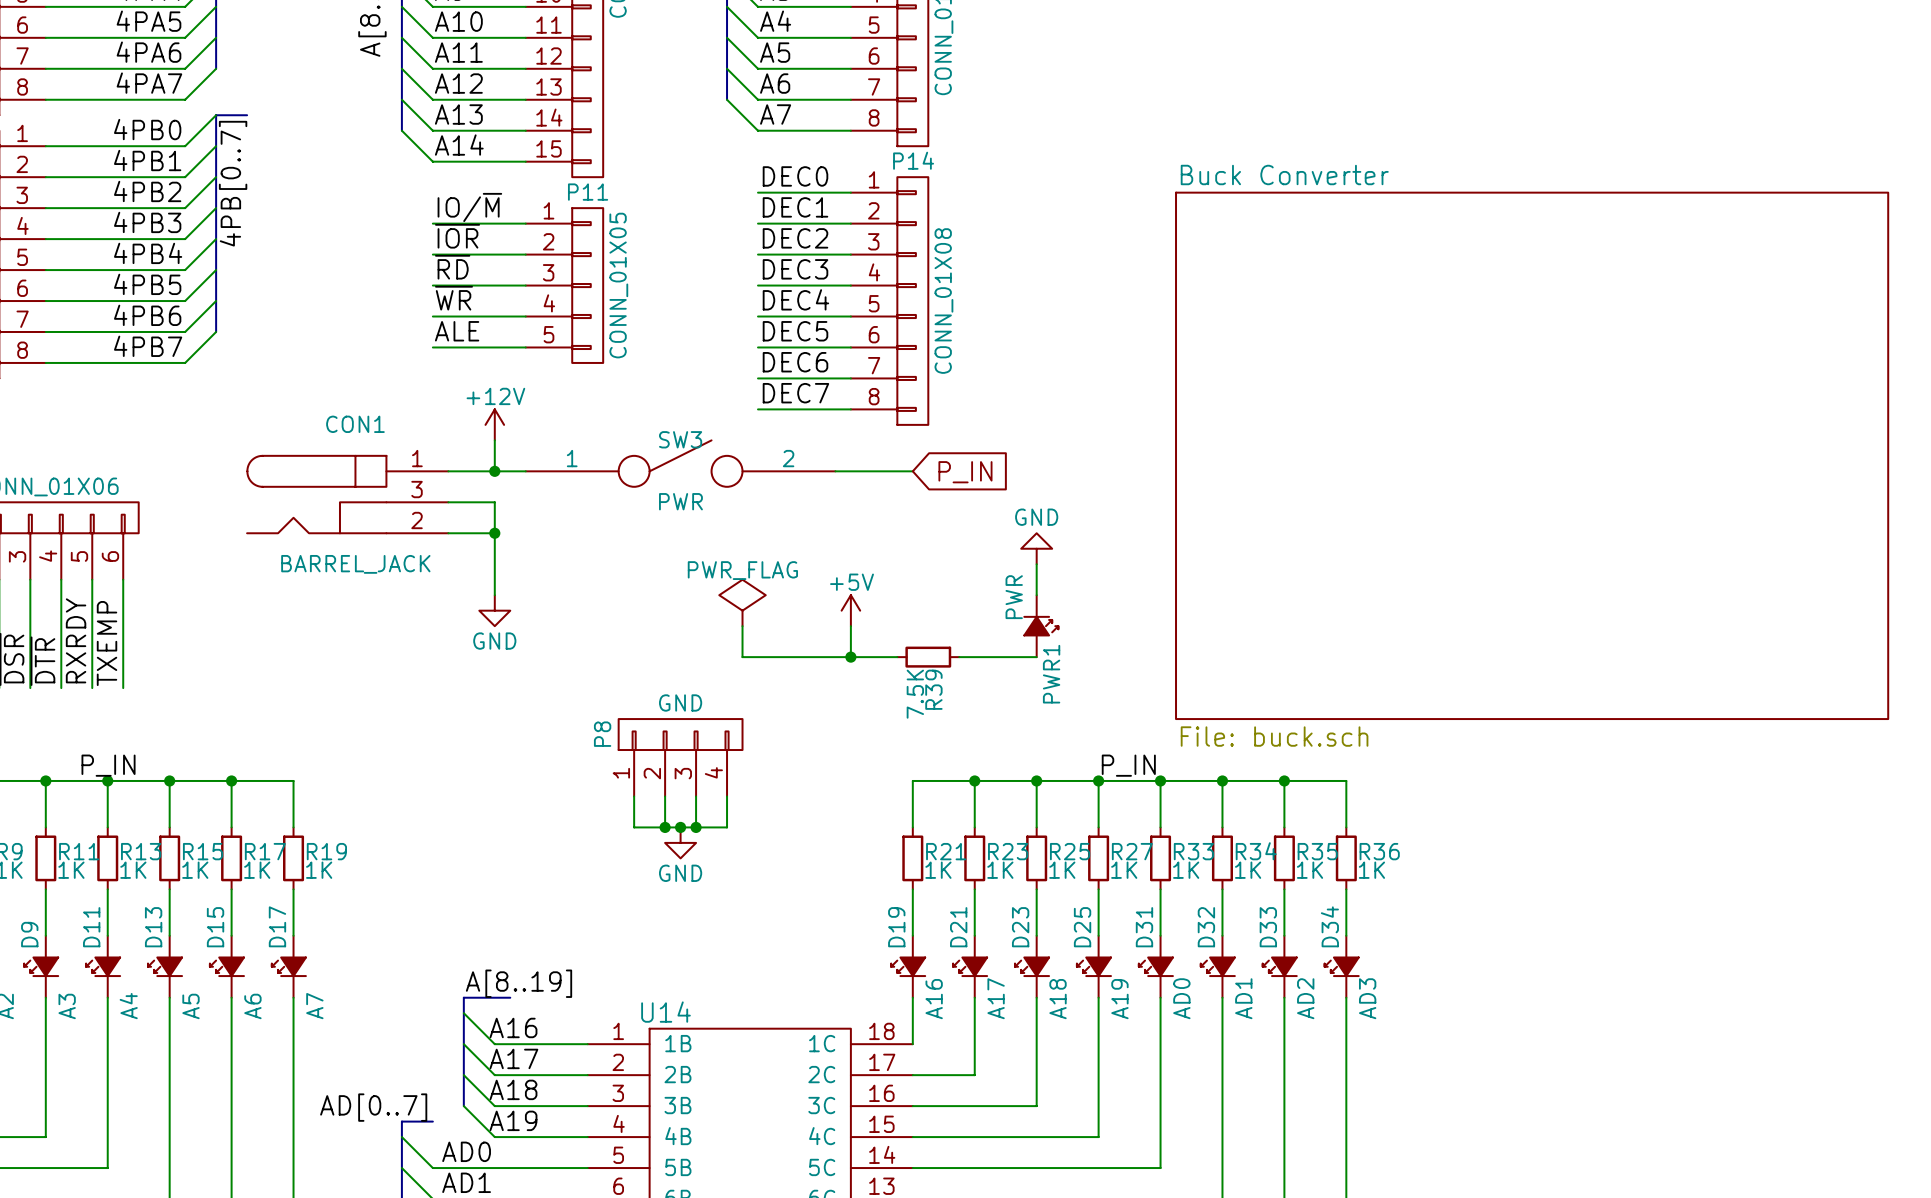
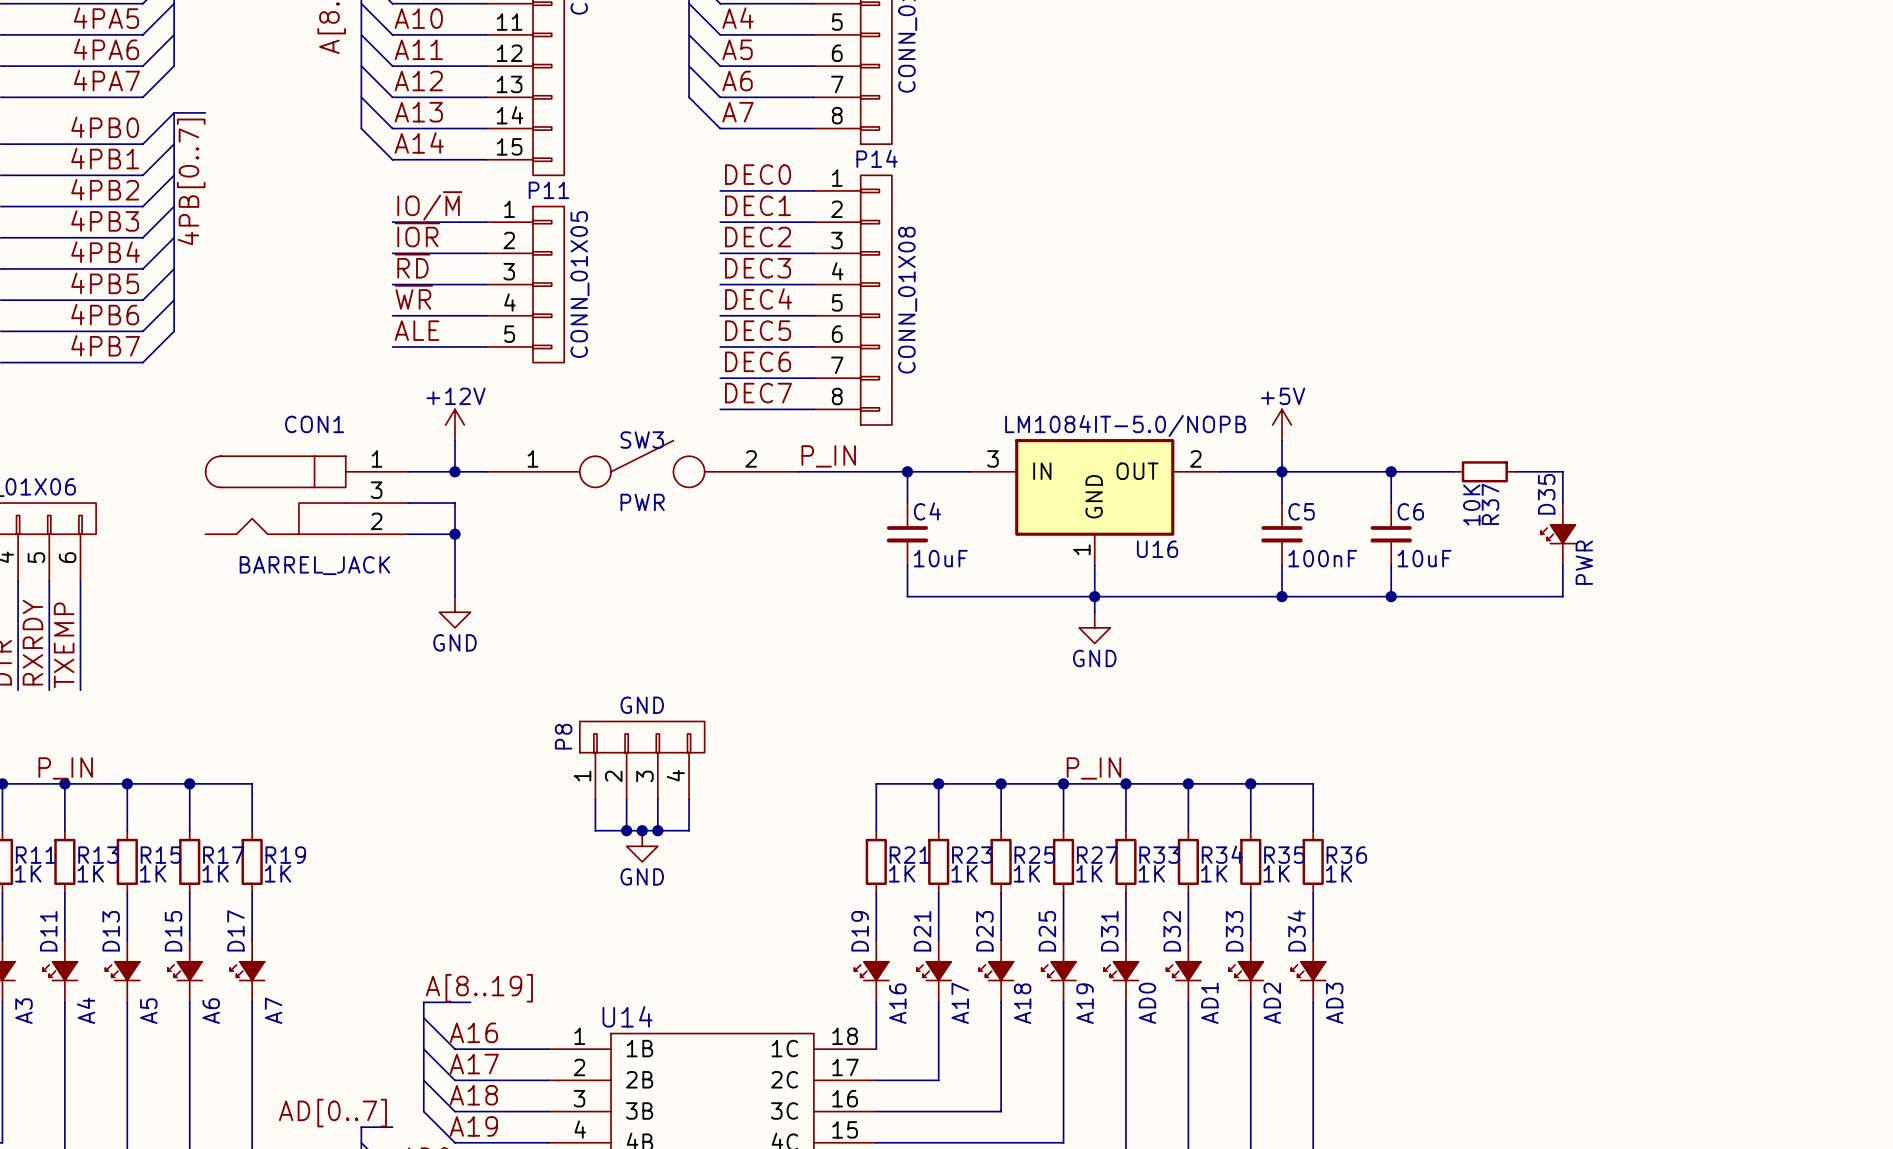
power symbol: none -> +5V (1281, 425)
wire: none -> (1281, 440) (1281, 503)
sheet Buck Converter: File: buck.sch (1532, 455) -> none
label: none -> P_IN (828, 456)
wire: none -> (876, 471) (969, 471)
junction: none -> (907, 471)
wire: none -> (1219, 471) (1453, 471)
junction: none -> (1281, 471)
wire: none -> (1391, 471) (1391, 503)
junction: none -> (1391, 471)
R37: none -> 10K (1484, 471)
wire: none -> (1516, 471) (1562, 471) (1562, 503)
global label: P_IN (965, 472) -> none
U16: none -> LM1084IT-5.0/NOPB (1094, 502)
C4: none -> 10uF (907, 534)
C5: none -> 100nF (1281, 534)
C6: none -> 10uF (1391, 534)
D35: none -> PWR (1558, 534)
power symbol rotation: 0° (1036, 548) -> 180° (1094, 627)
power symbol position: GND (1036, 548) -> GND (1094, 627)
wire: none -> (907, 565) (907, 596) (1562, 596) (1562, 565)
wire: (1036, 564) (1036, 595) -> (907, 471) (907, 503)
wire: none -> (1094, 565) (1094, 612)
wire: none -> (1281, 565) (1281, 596)
wire: none -> (1391, 565) (1391, 596)
junction: none -> (1094, 596)
junction: none -> (1281, 596)
junction: none -> (1391, 596)
power symbol: PWR_FLAG (742, 602) -> none
power symbol: +5V (850, 610) -> none
wire: (742, 626) (742, 657) (897, 657) -> none
wire: (850, 626) (850, 657) -> none
PWR1: PWR (1041, 626) -> none
junction: (850, 657) -> none
R39: 7.5K (928, 657) -> none
wire: (959, 657) (1036, 657) -> none

